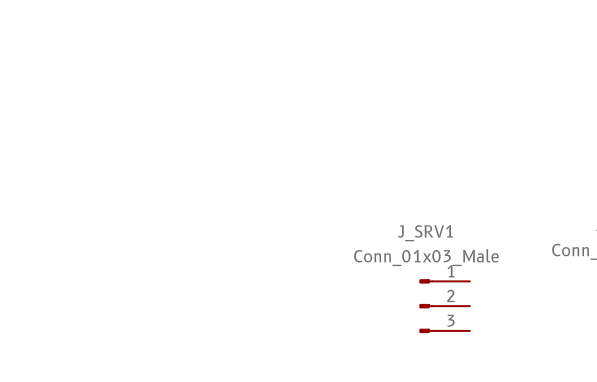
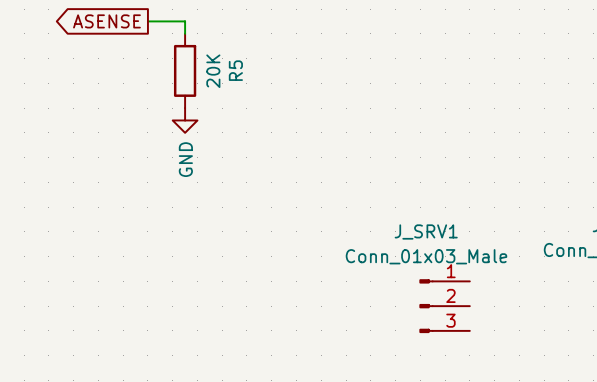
global label: none -> ASENSE (106, 21)
wire: none -> (147, 21) (185, 21) (185, 33)
R5: none -> 20K (185, 70)
power symbol: none -> GND (185, 120)

